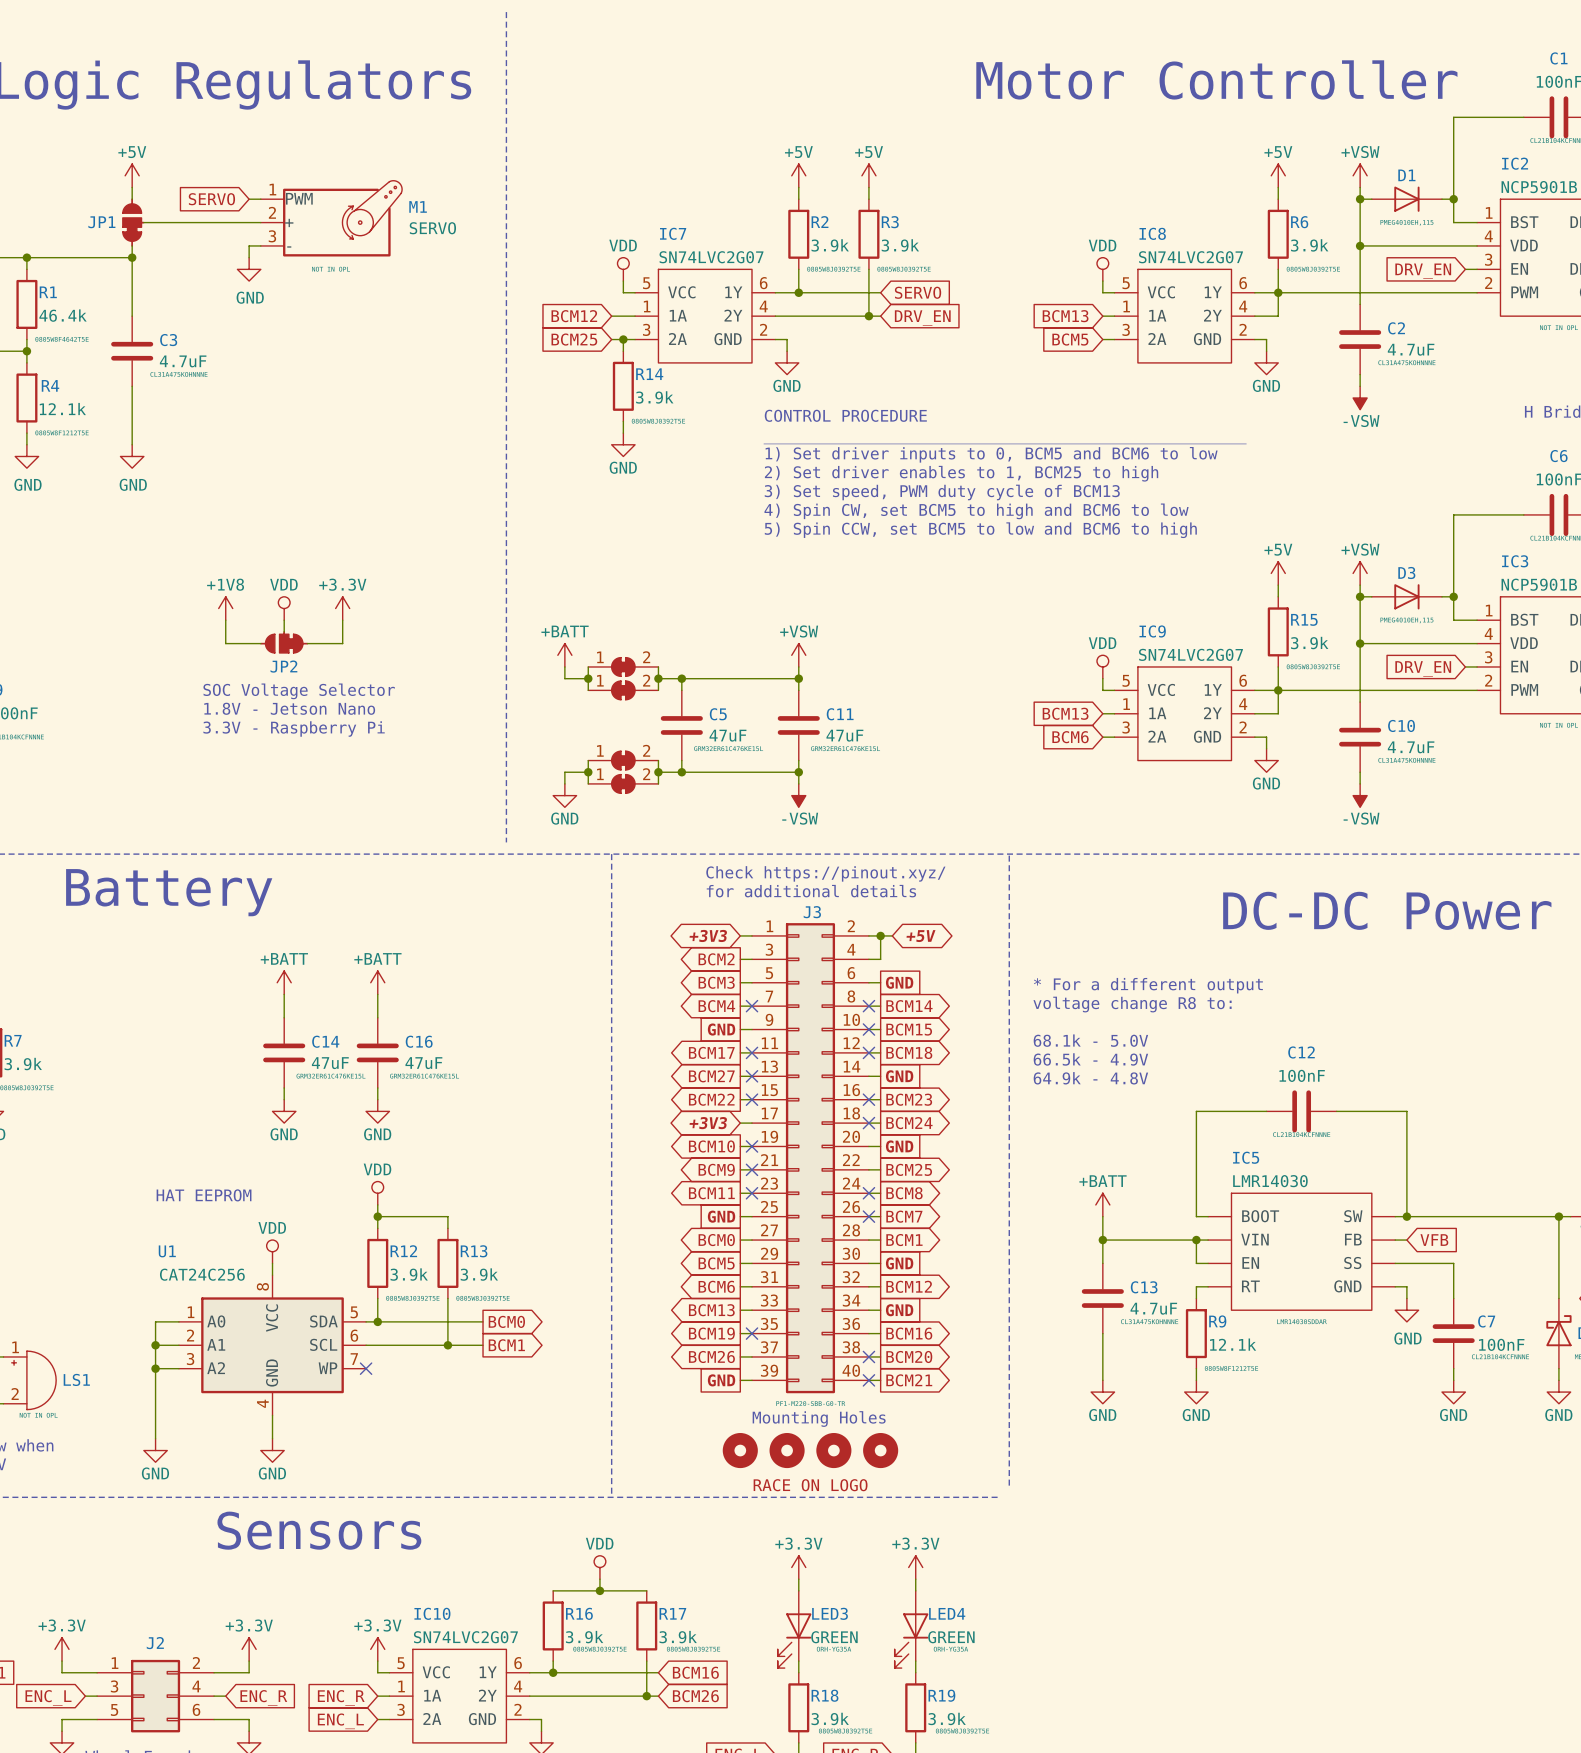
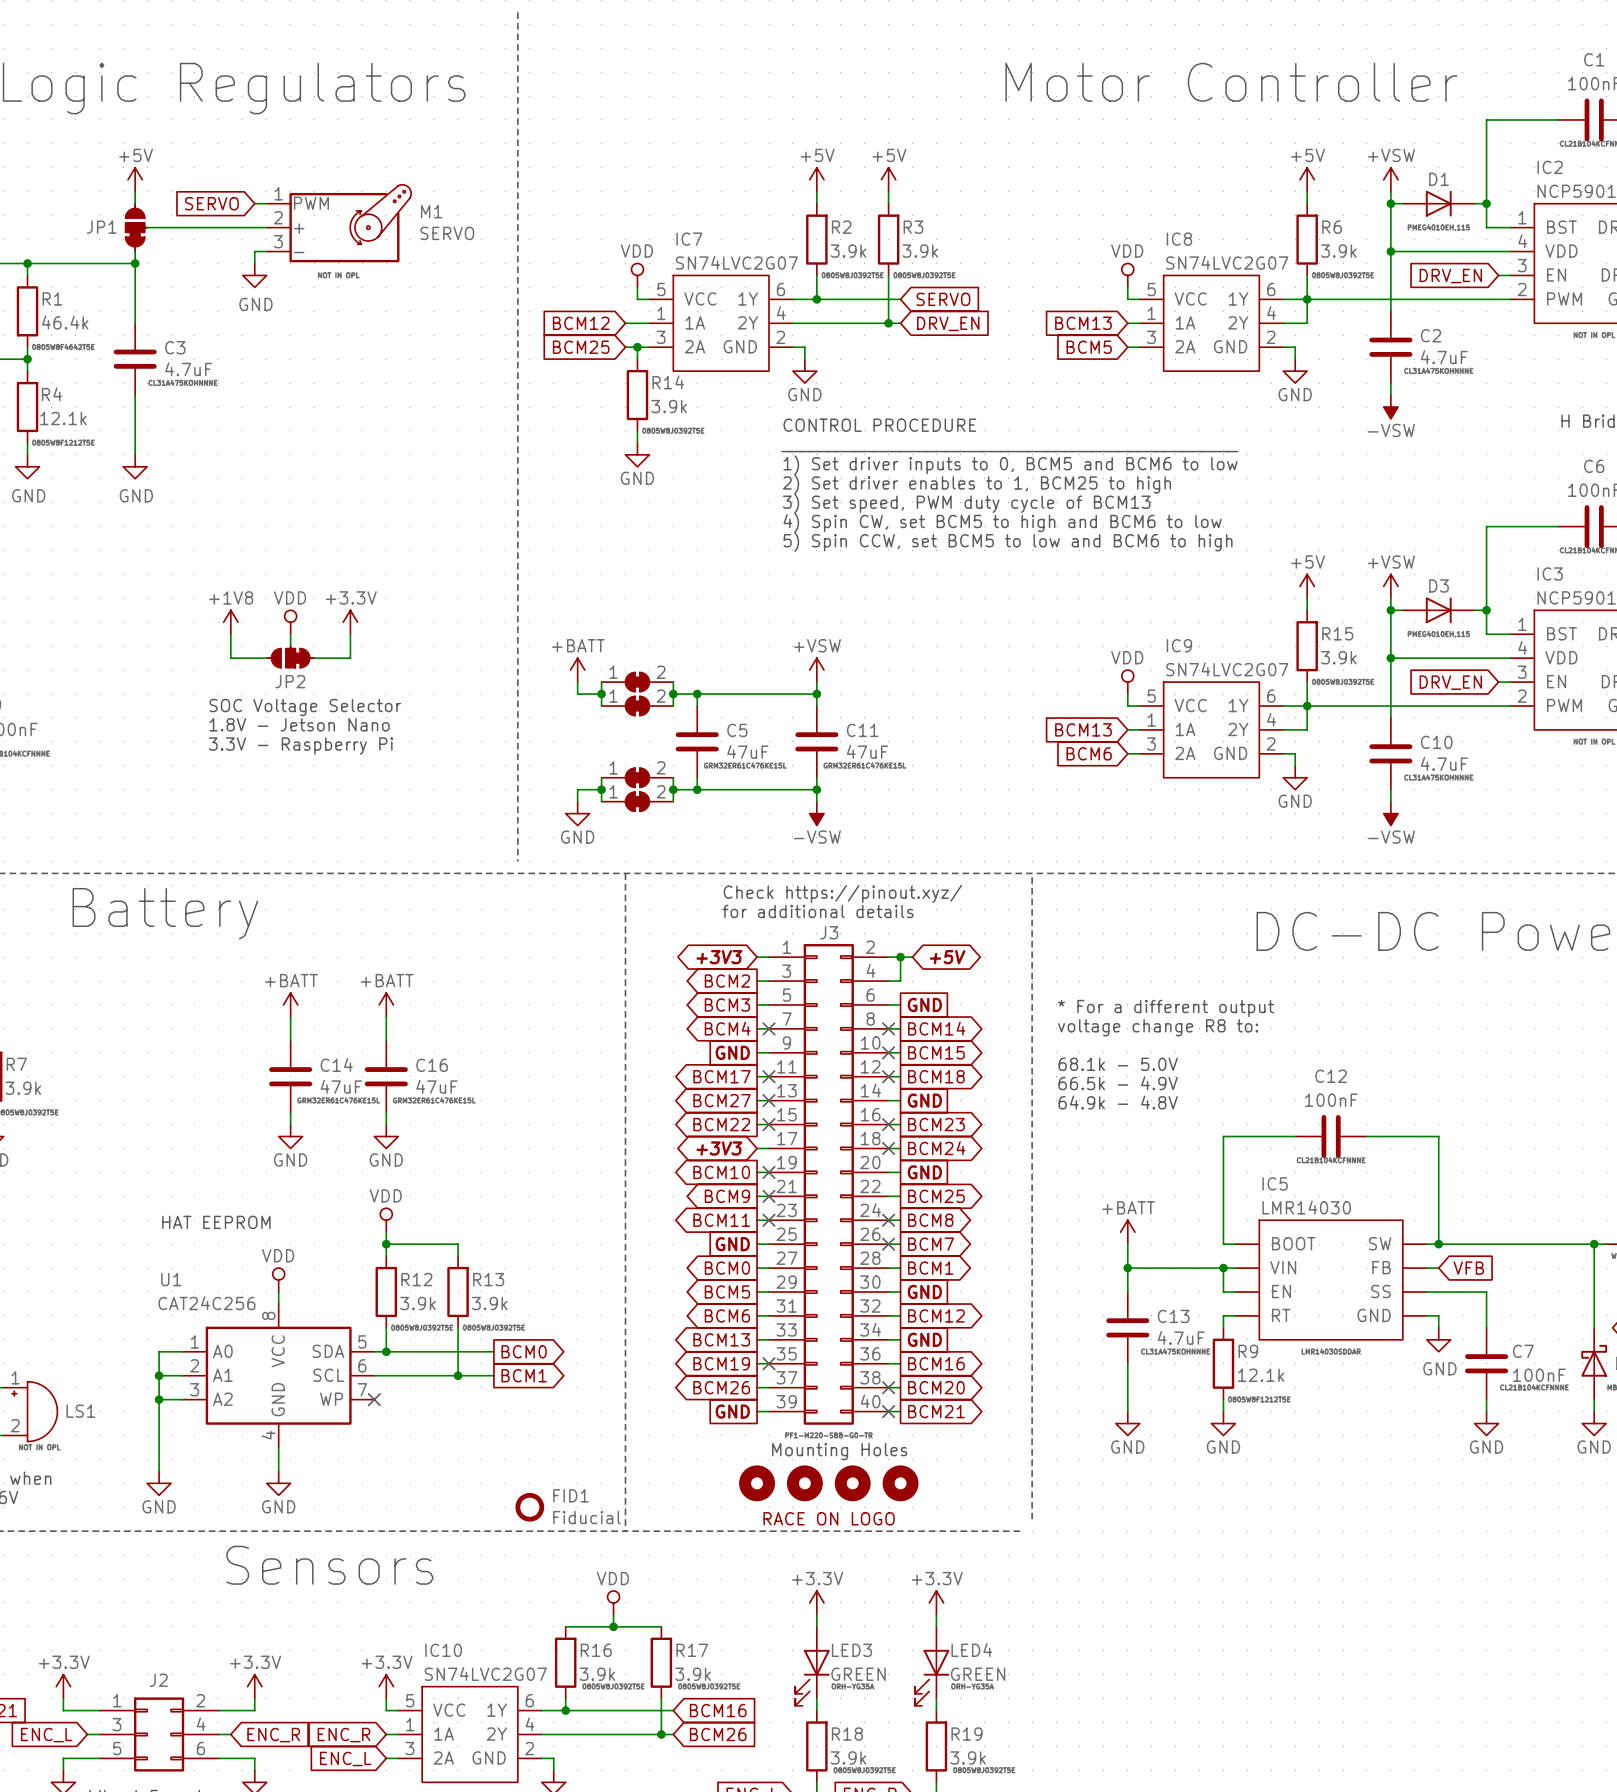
FID1: none -> Fiducial (529, 1507)

